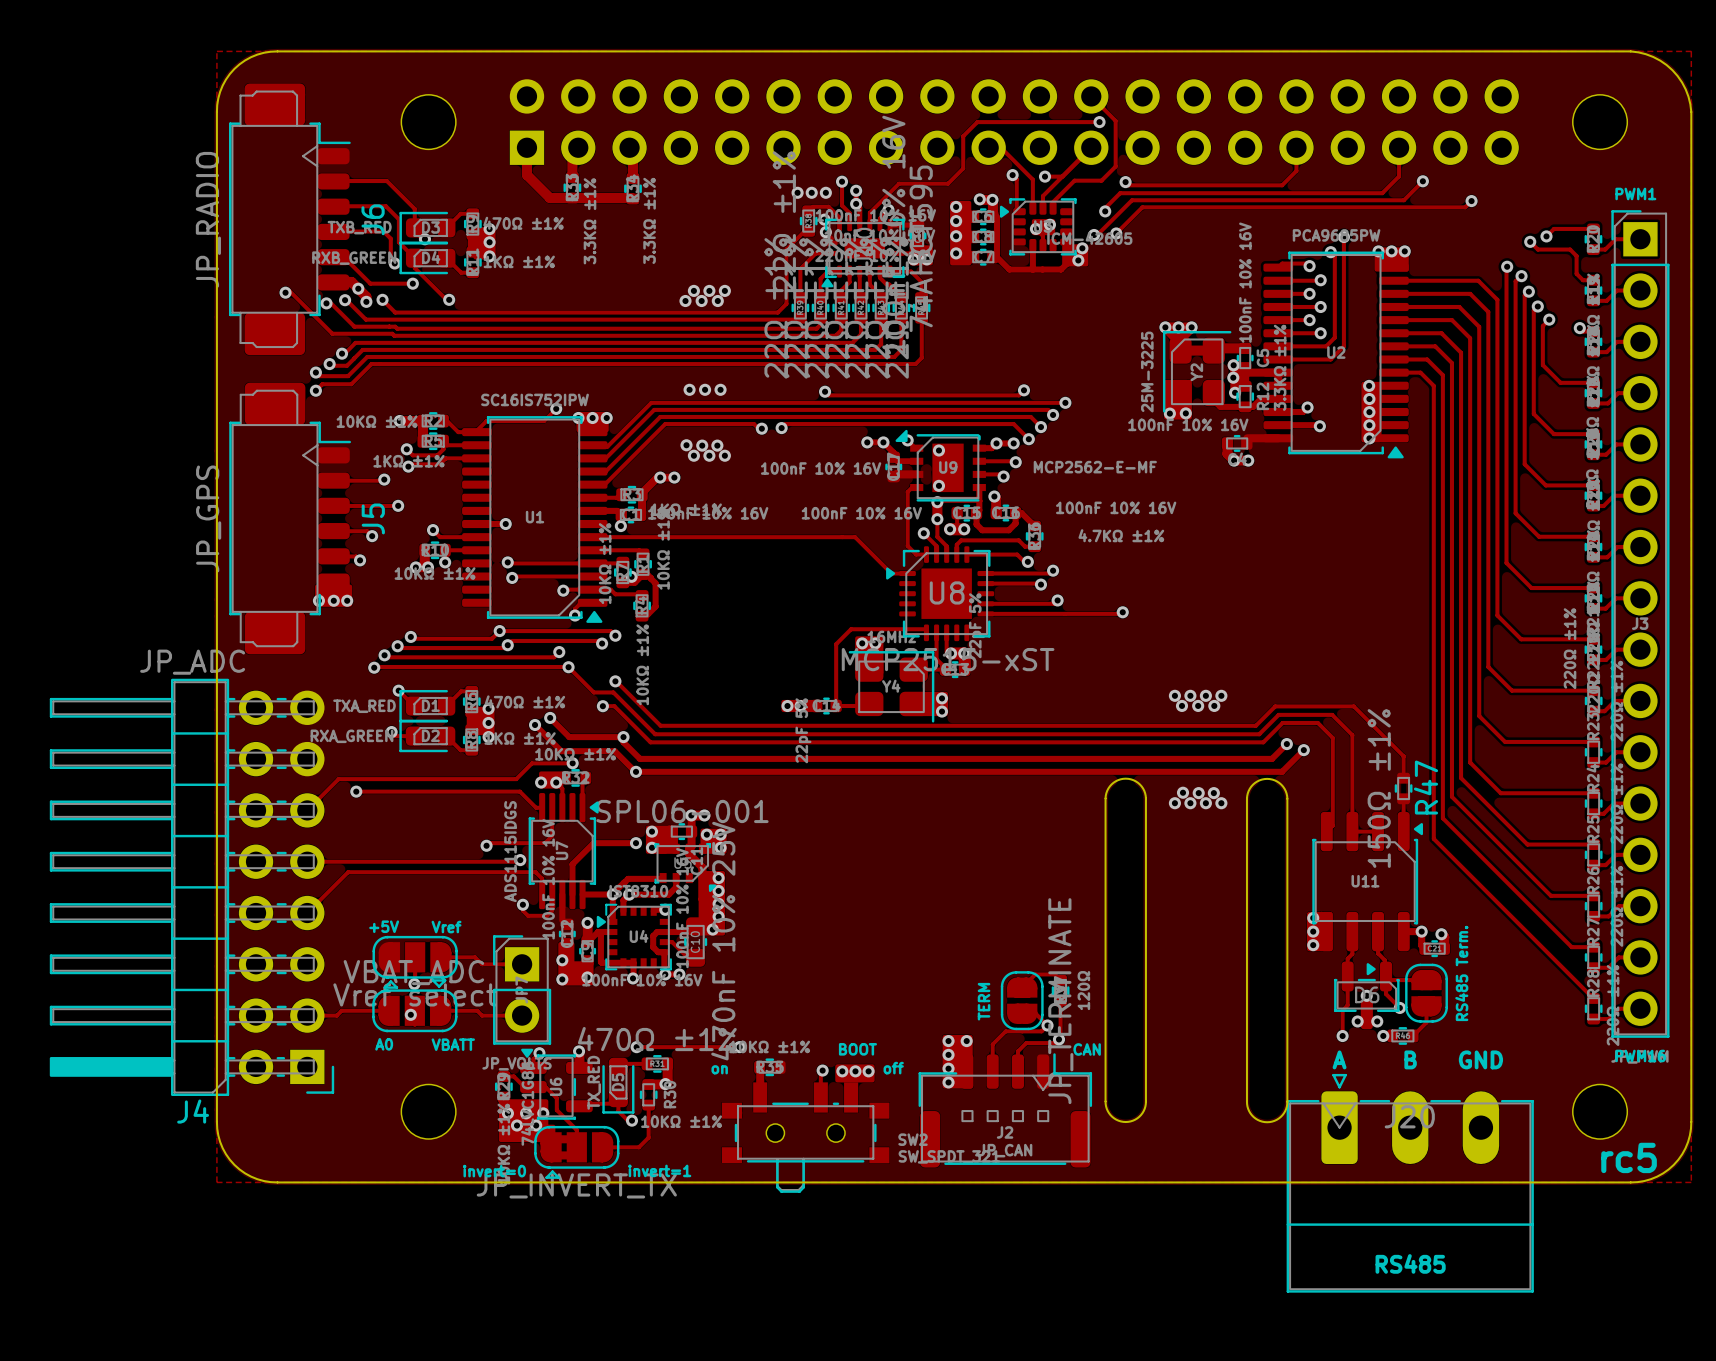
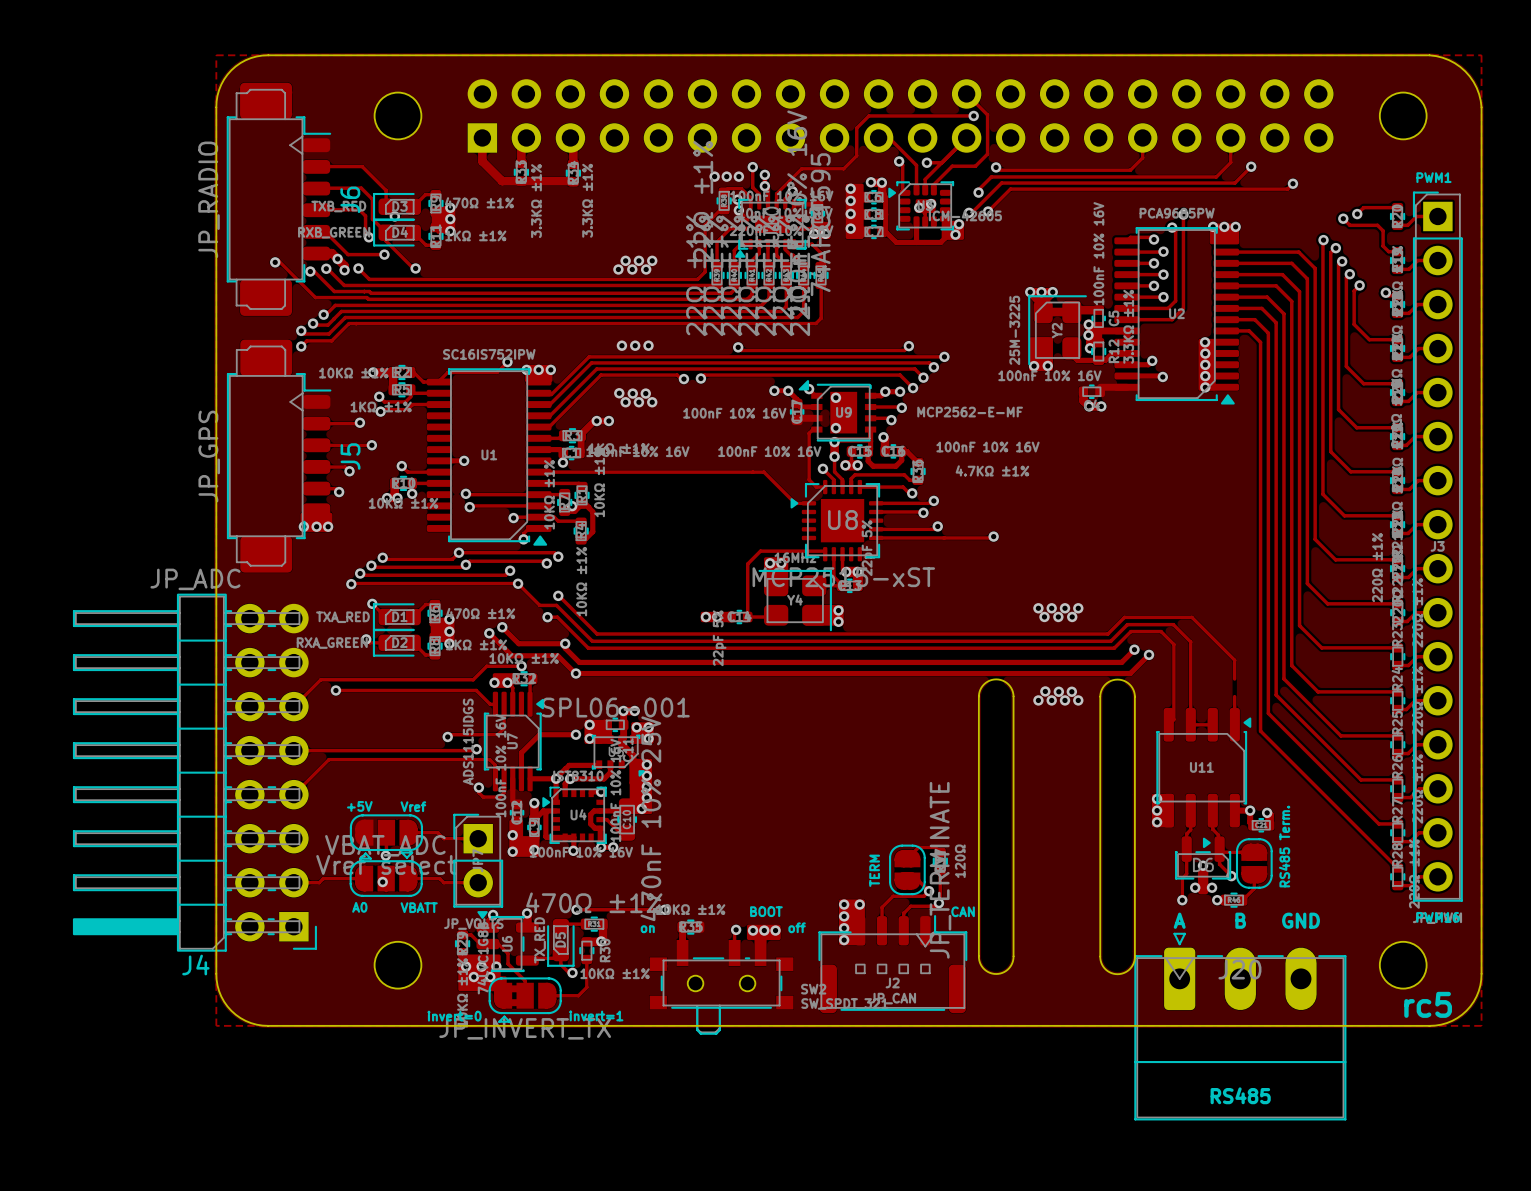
R47: 150Ω ±1% (1403, 788) -> none

